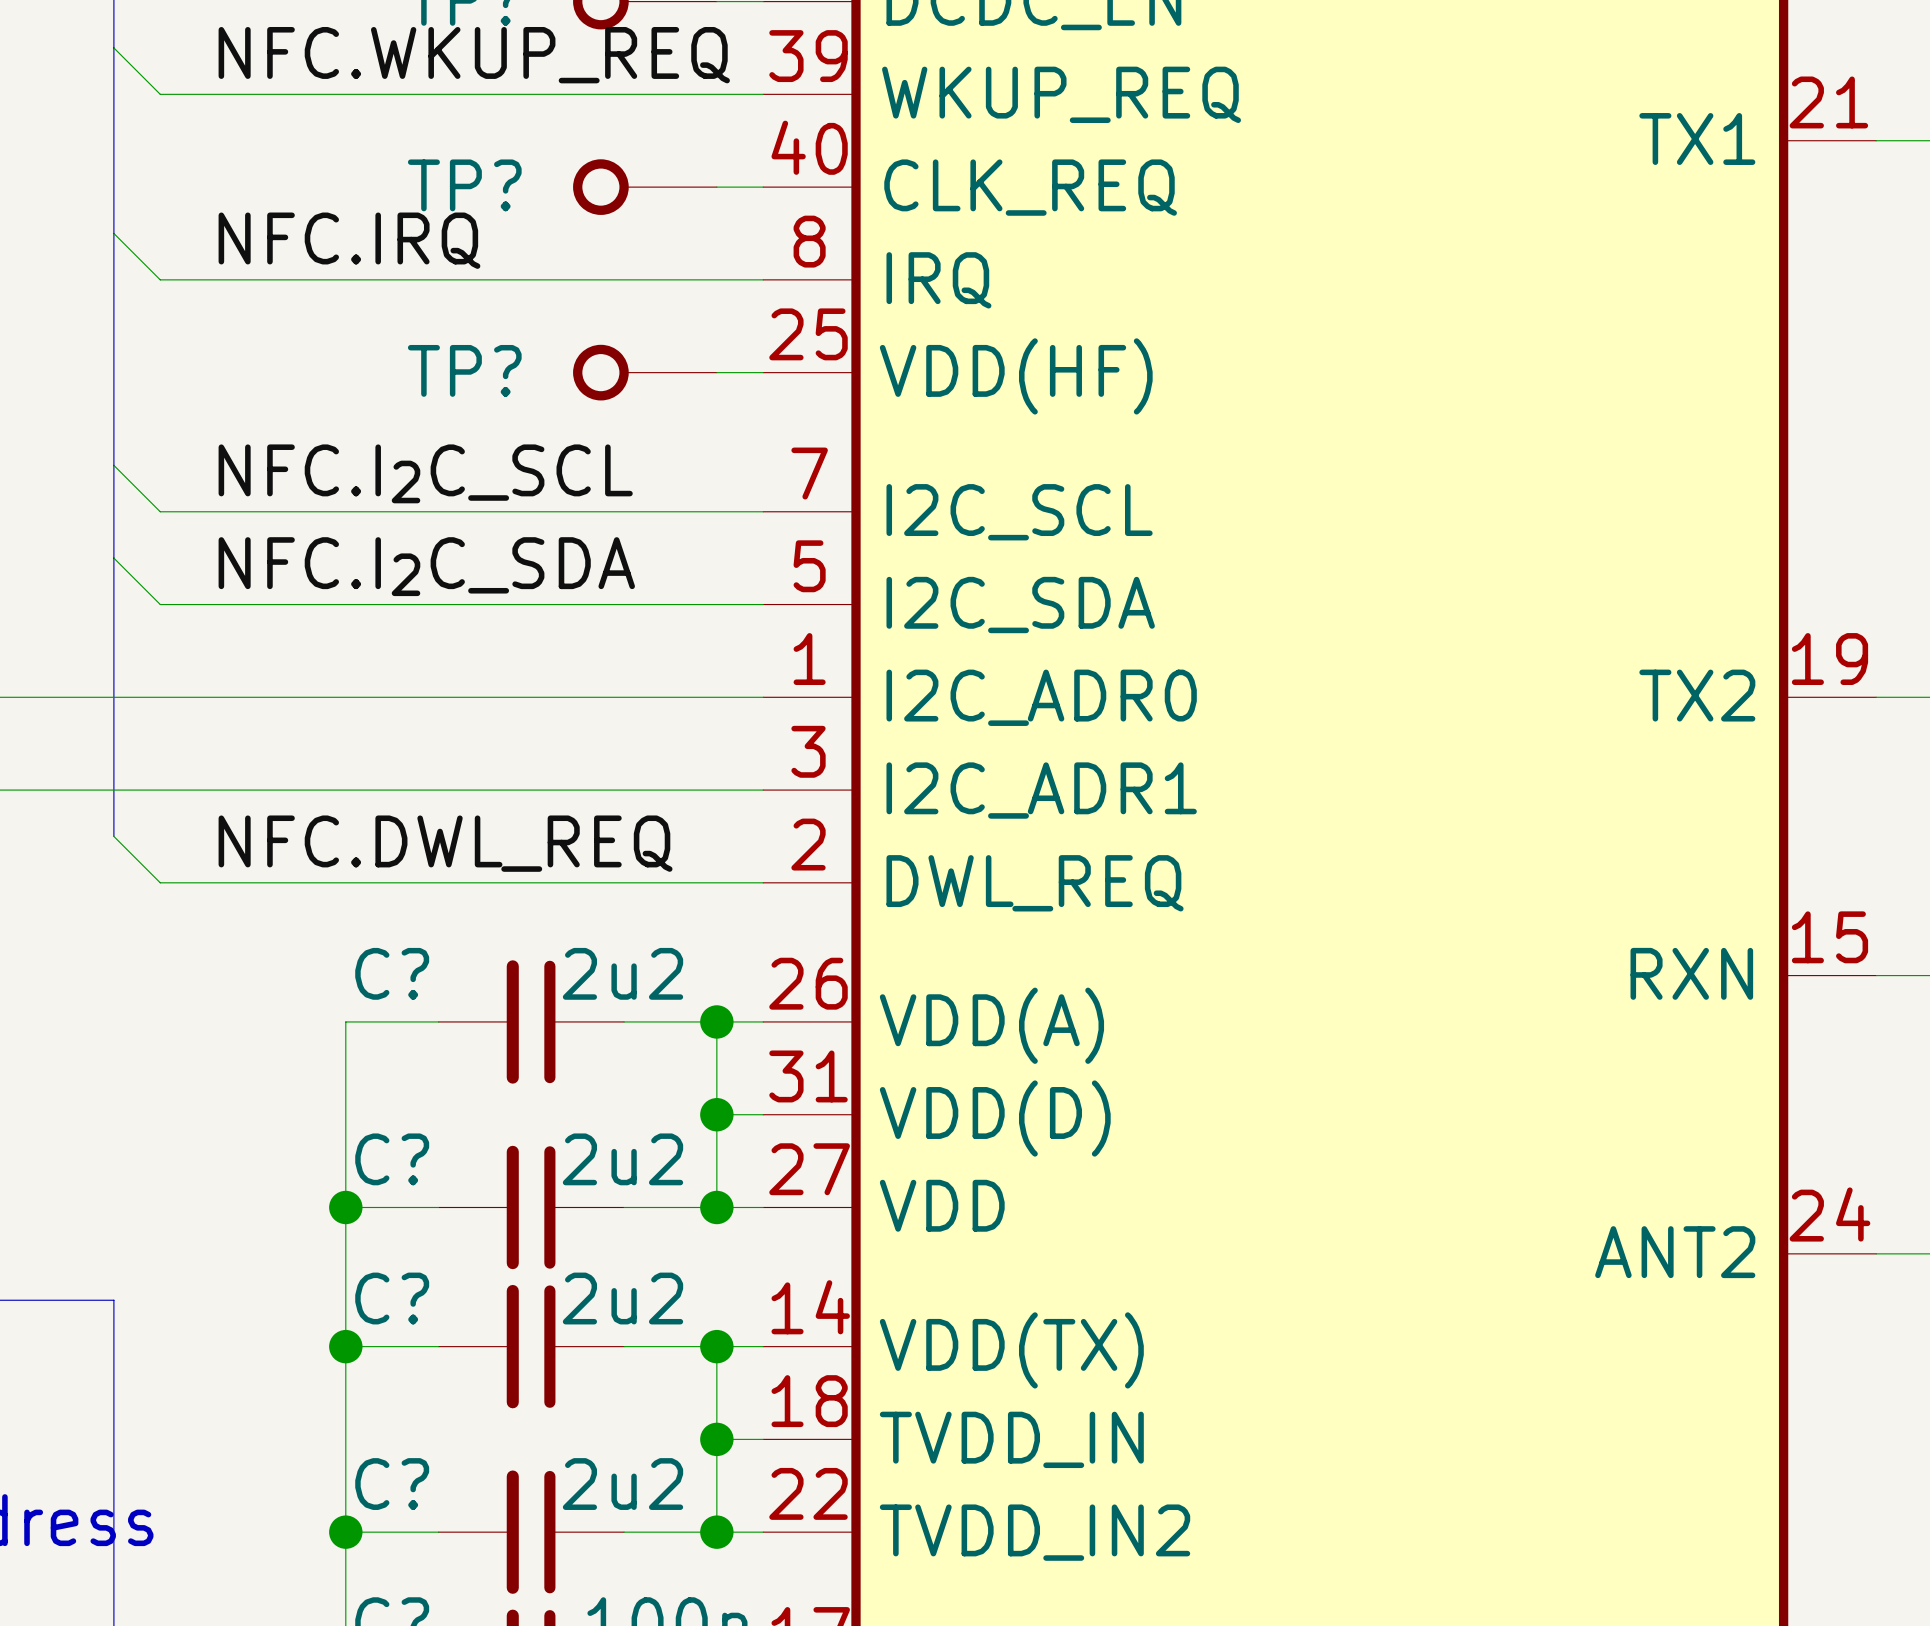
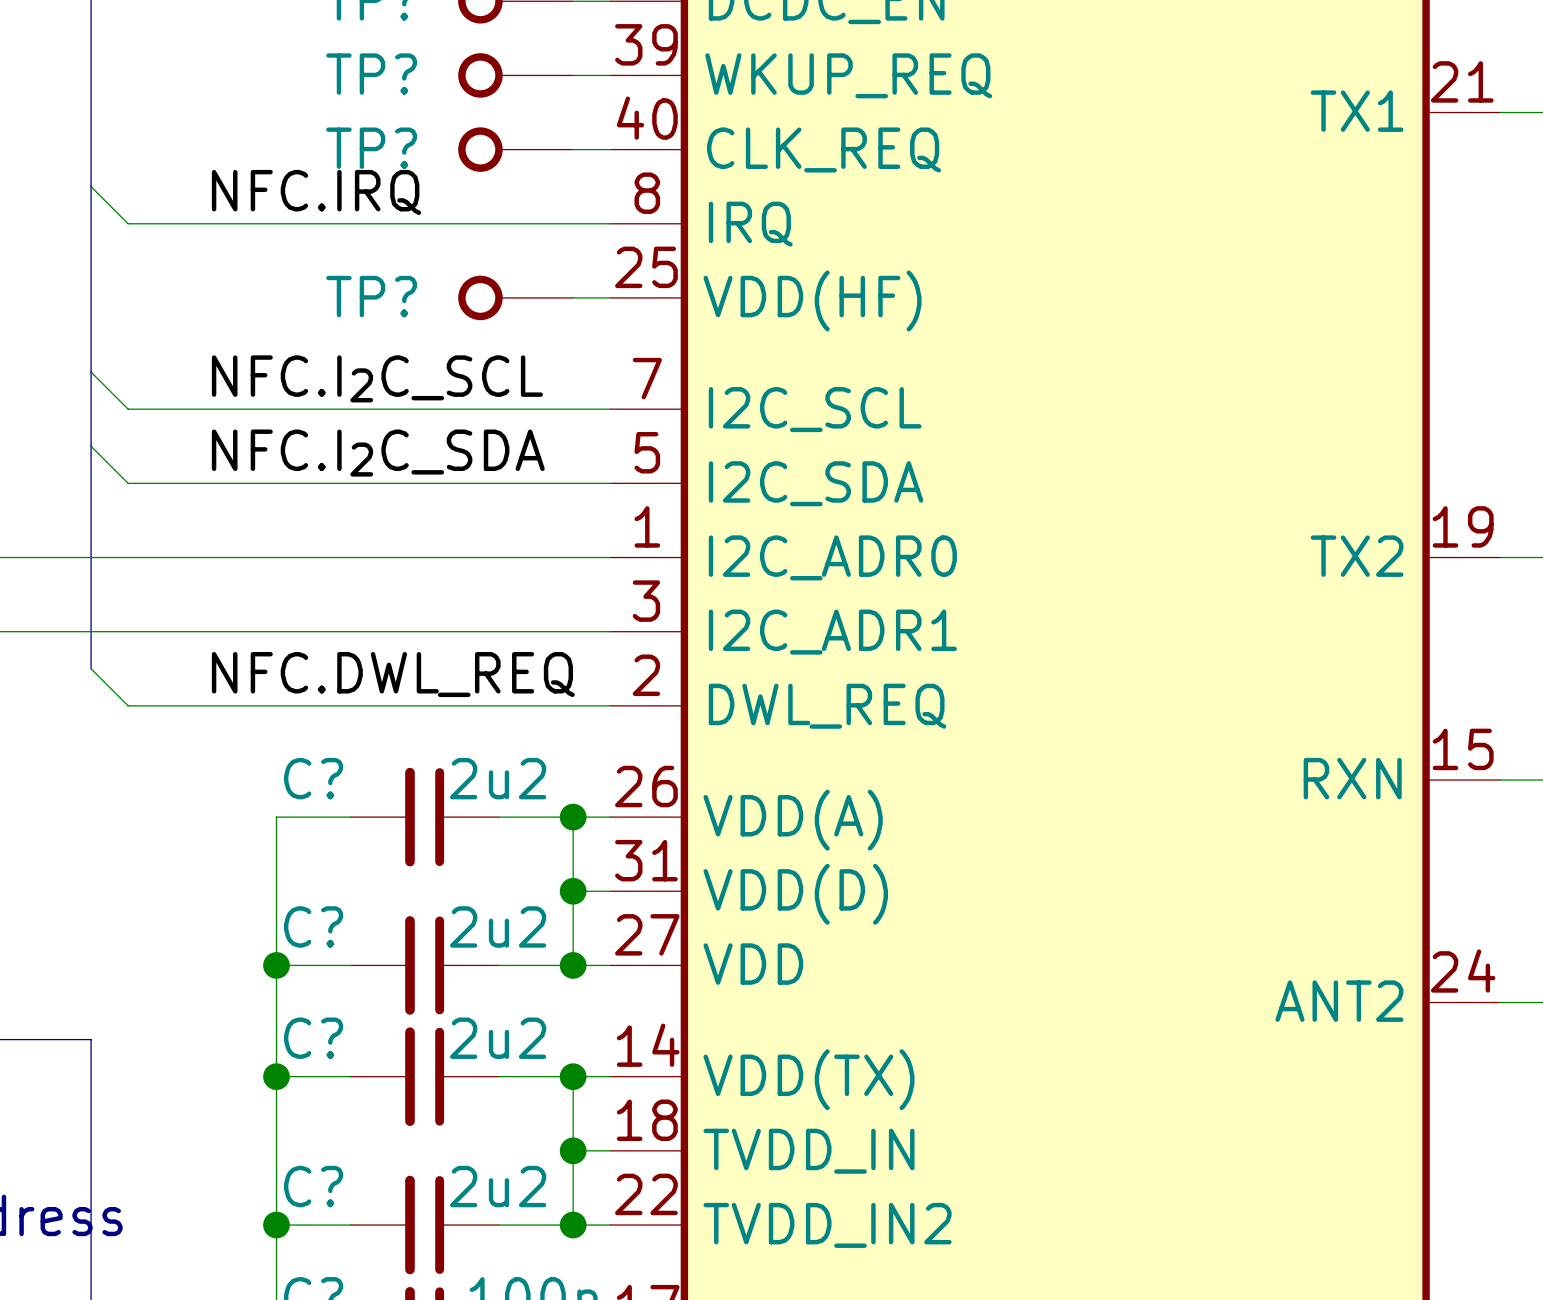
wire: (113, 47) (160, 94) (716, 94) -> none
label: NFC.WKUP_REQ (474, 55) -> none
TP?: none -> (515, 75)
label position: NFC.IRQ (349, 240) -> NFC.IRQ (316, 192)
label position: NFC.I2C_SCL (425, 473) -> NFC.I2C_SCL (377, 378)
label position: NFC.I2C_SDA (426, 566) -> NFC.I2C_SDA (378, 453)
label position: NFC.DWL_REQ (445, 843) -> NFC.DWL_REQ (393, 674)

